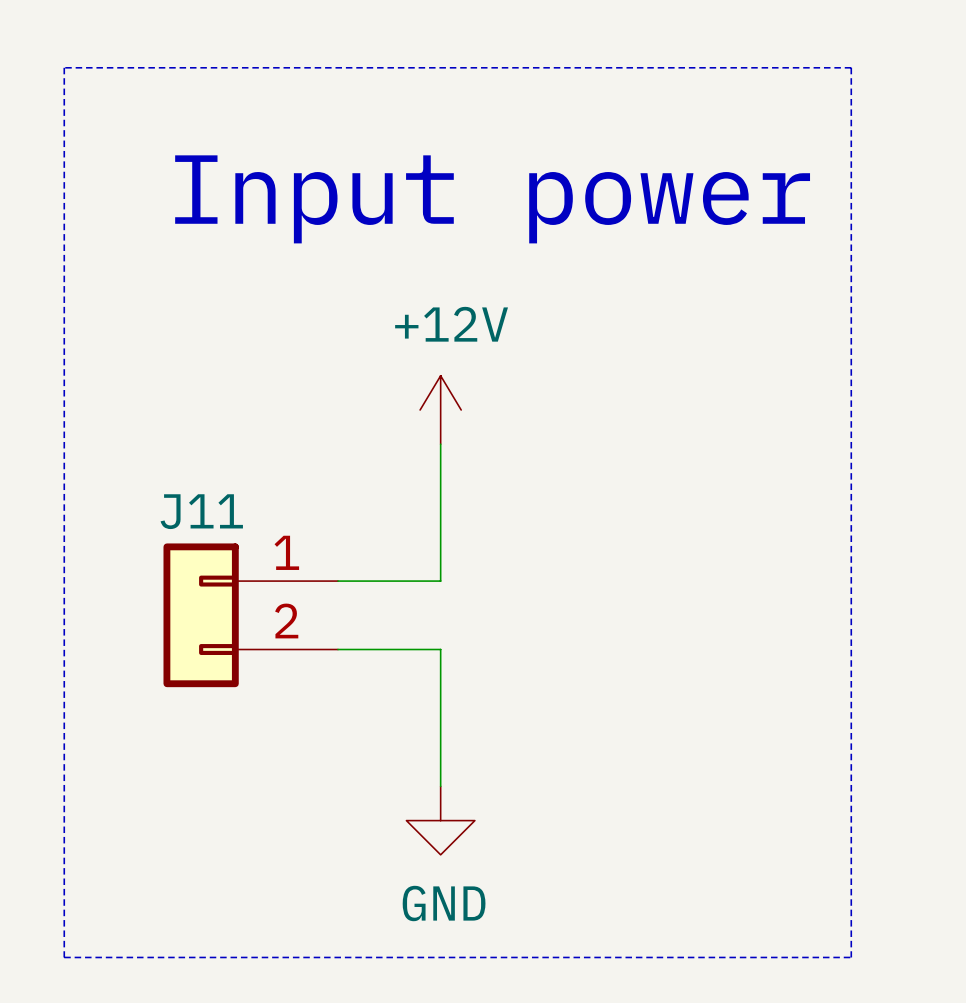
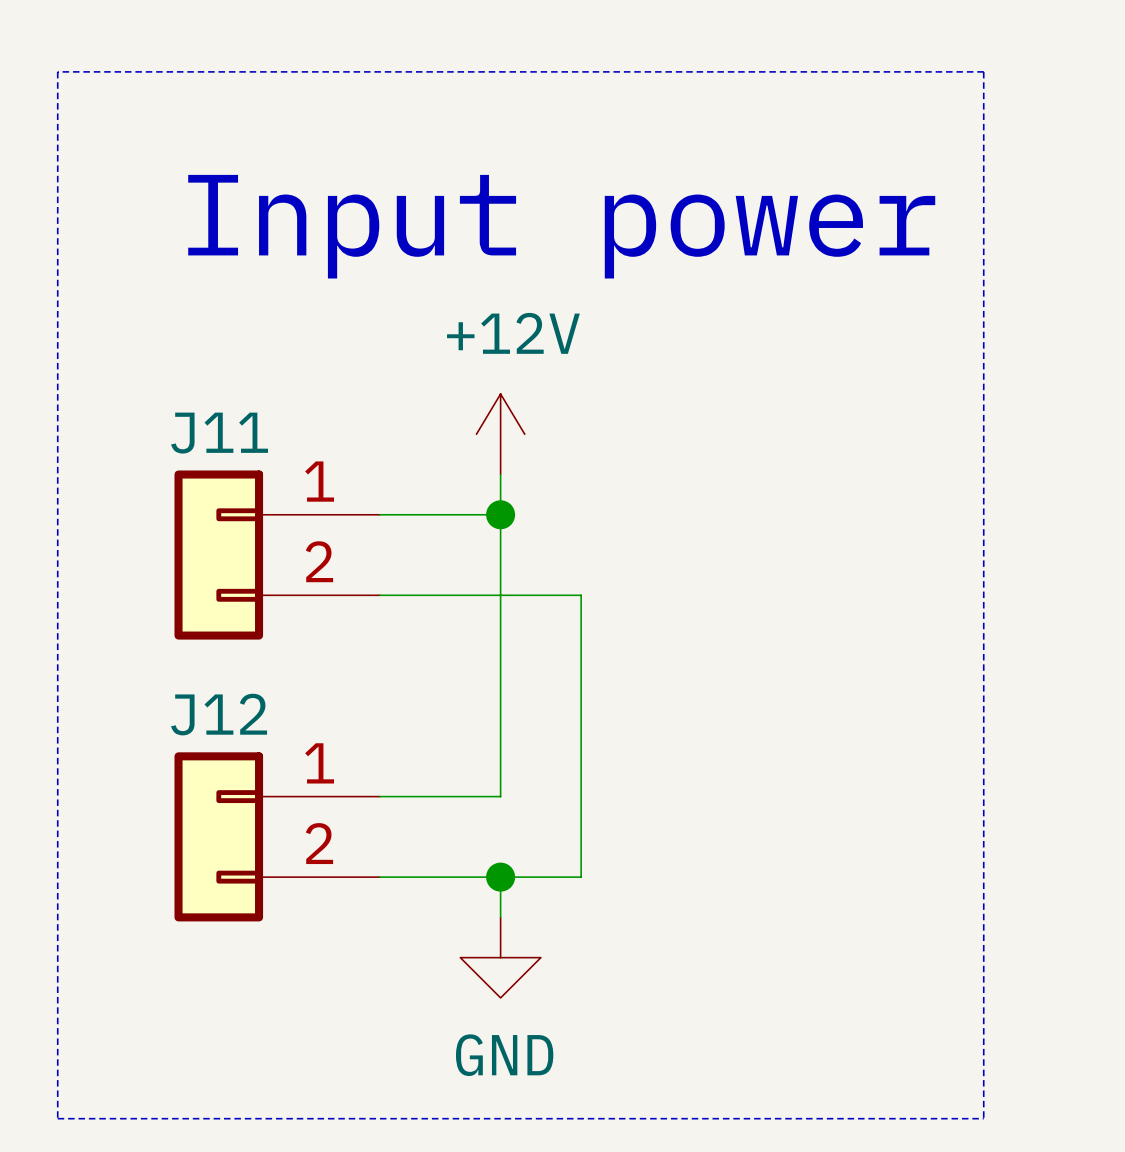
wire: none -> (500, 474) (500, 514) (379, 514)
power symbol position: +12V (440, 409) -> +12V (500, 434)
junction: none -> (500, 514)
wire: none -> (379, 595) (581, 595) (581, 877) (379, 877)
wire: (338, 581) (440, 581) -> (500, 756) (500, 675)
J11 position: (250, 615) -> (277, 555)
wire: (338, 649) (440, 649) -> none
wire: (440, 683) (440, 752) -> (500, 796) (379, 796)
J12: none -> (277, 836)
junction: none -> (500, 877)

